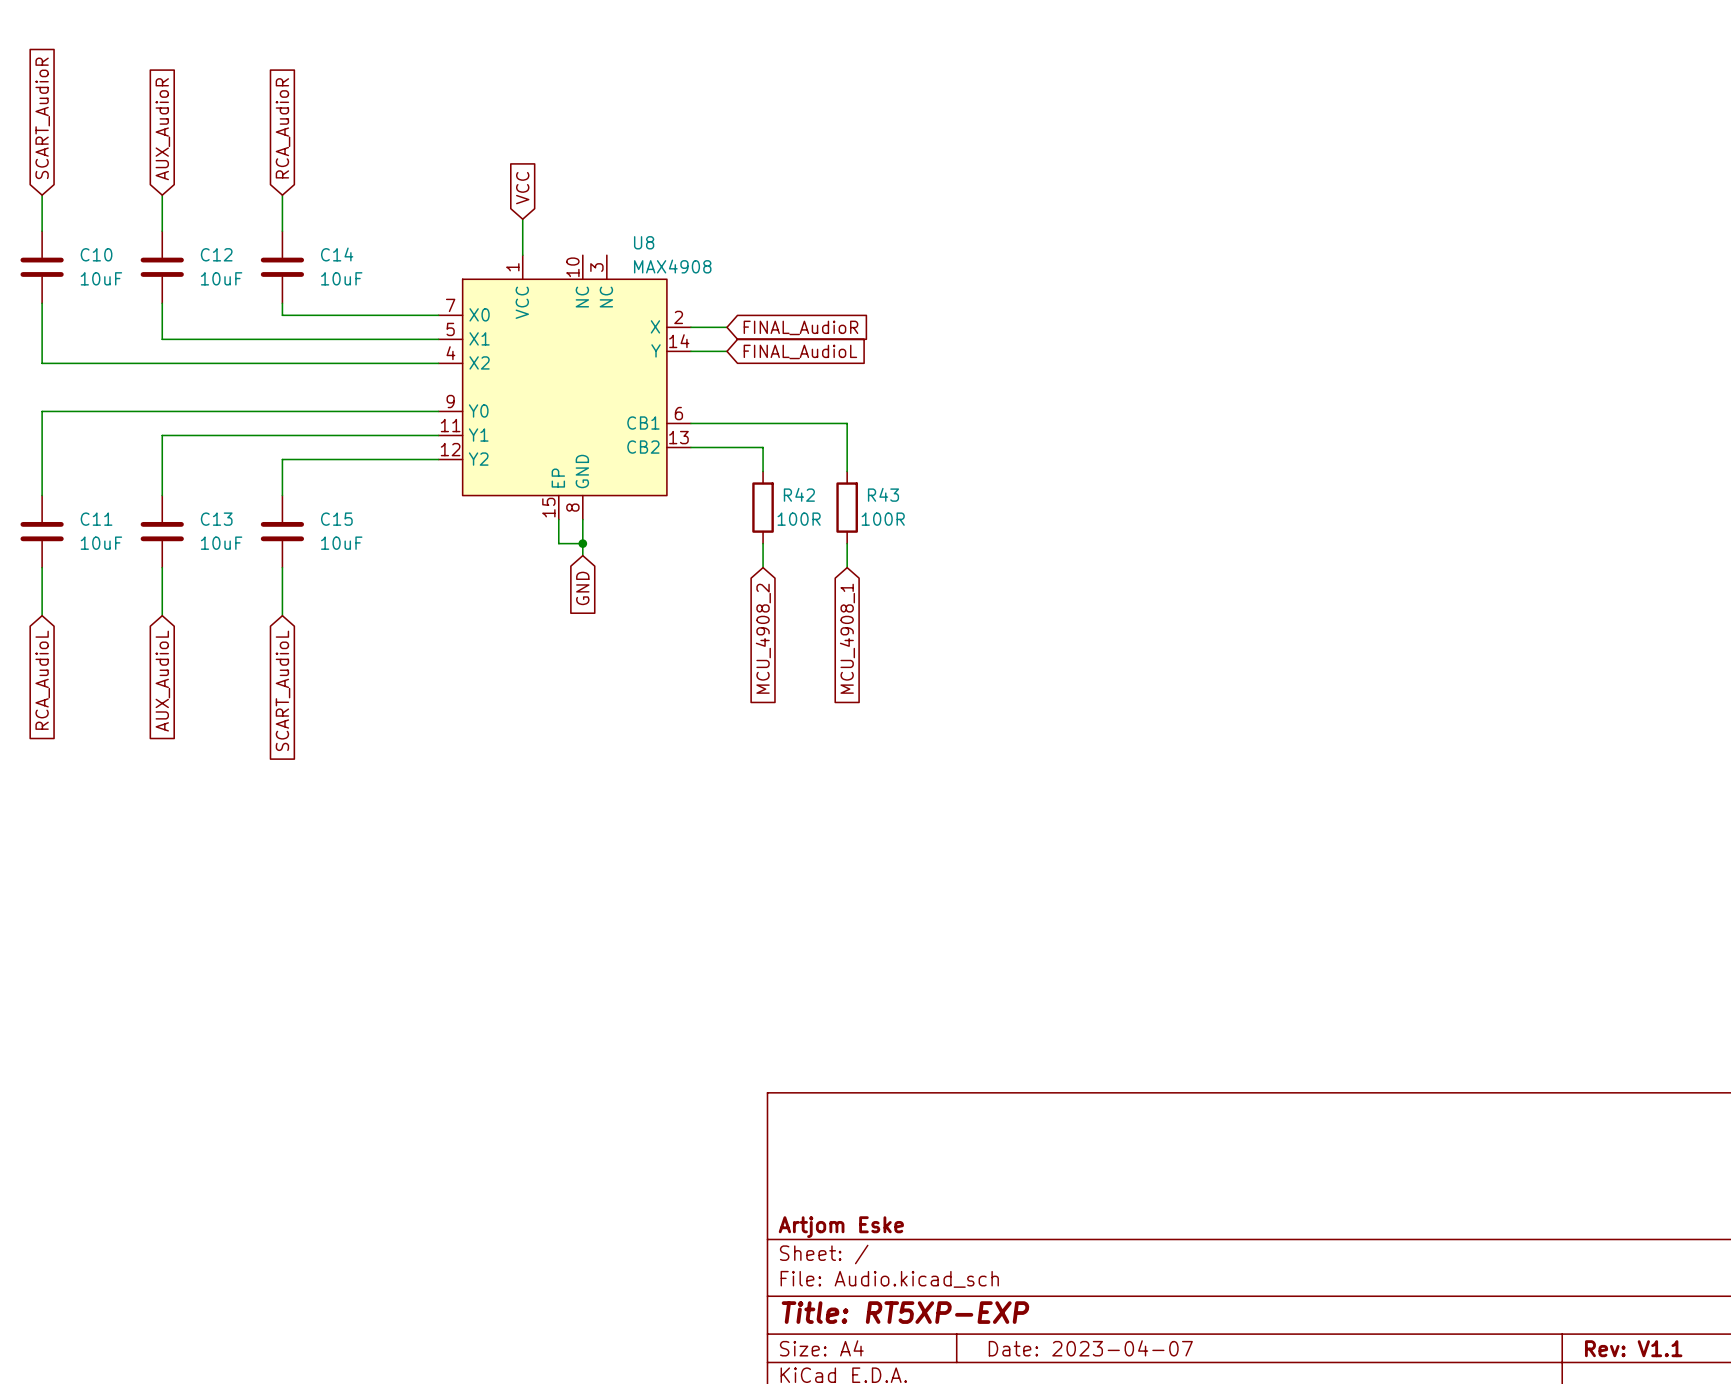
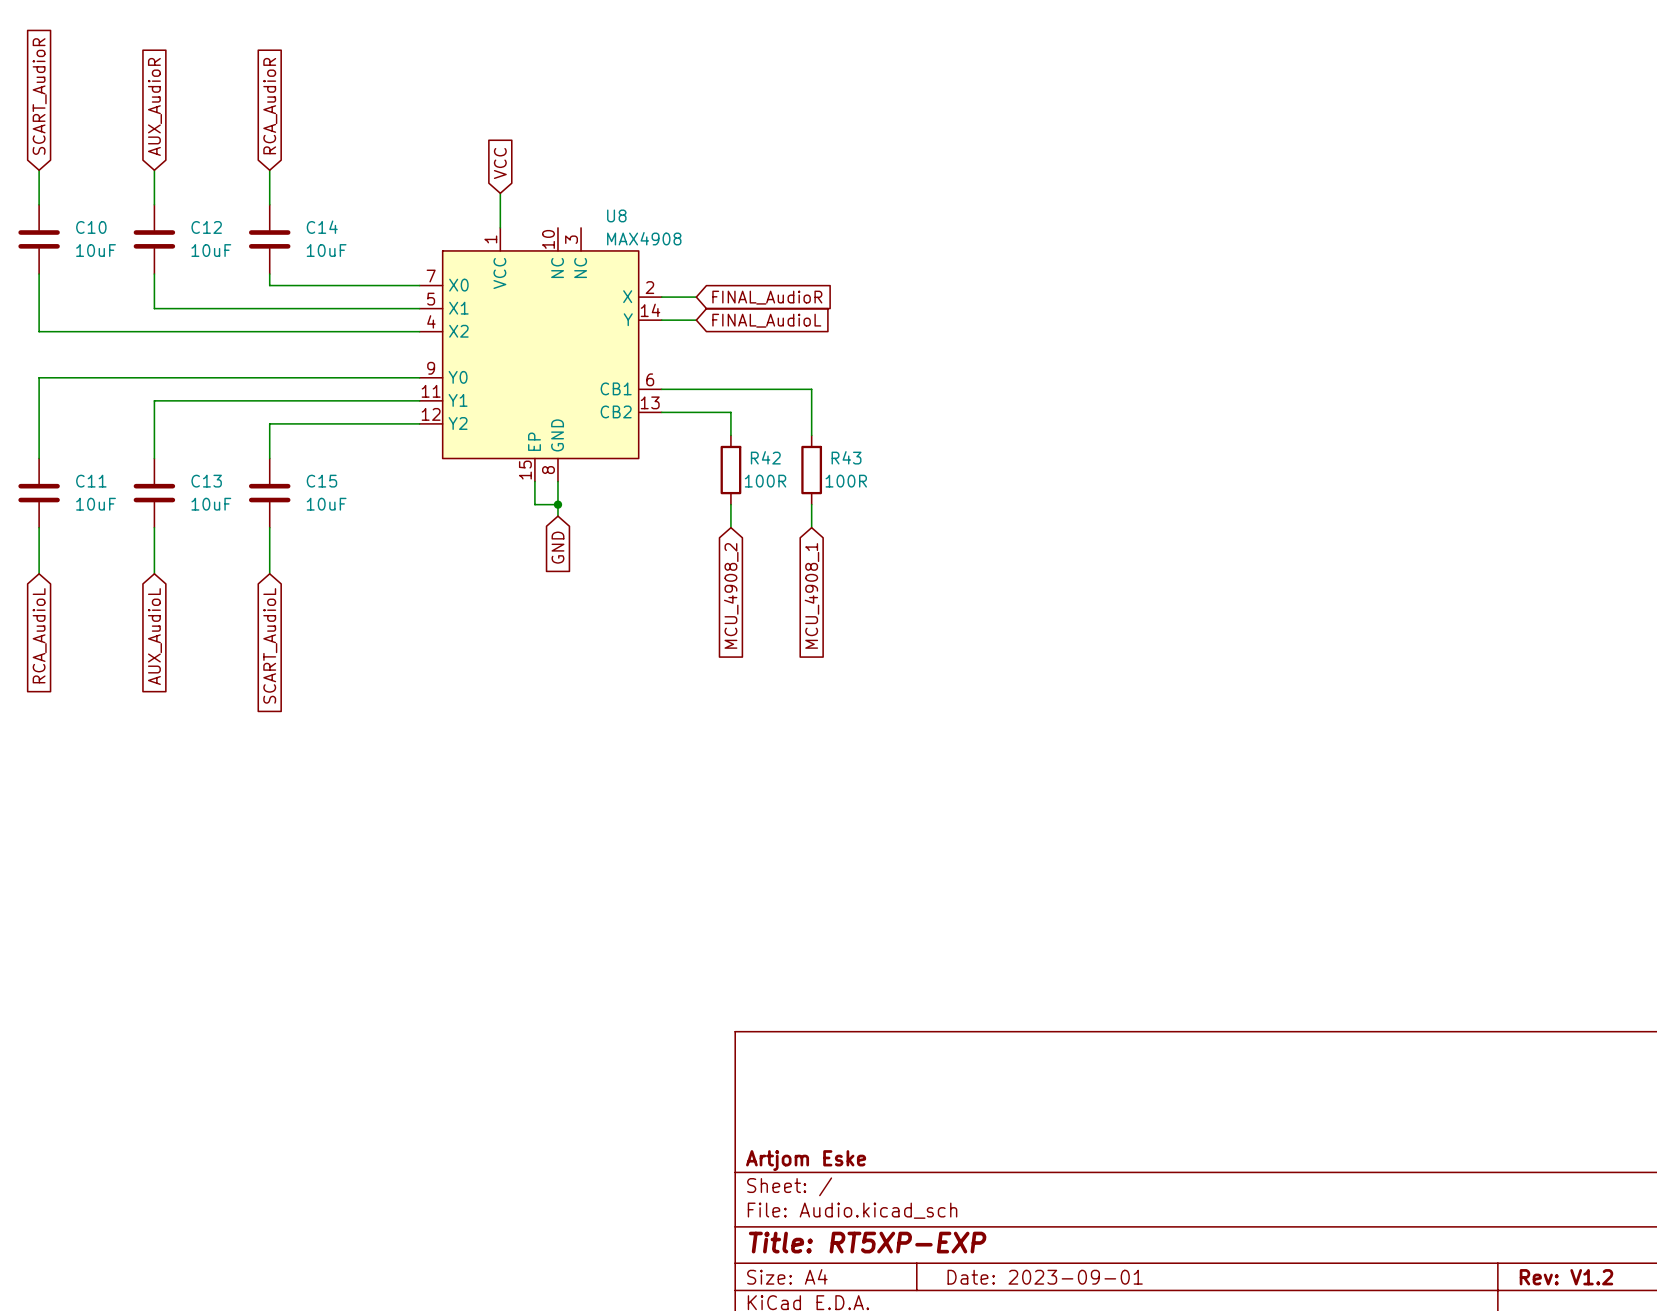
title block: Date: 2023-04-07 (1090, 1348) -> Date: 2023-09-01 (1045, 1277)
title block: Rev: V1.1 (1633, 1348) -> Rev: V1.2 (1566, 1277)

